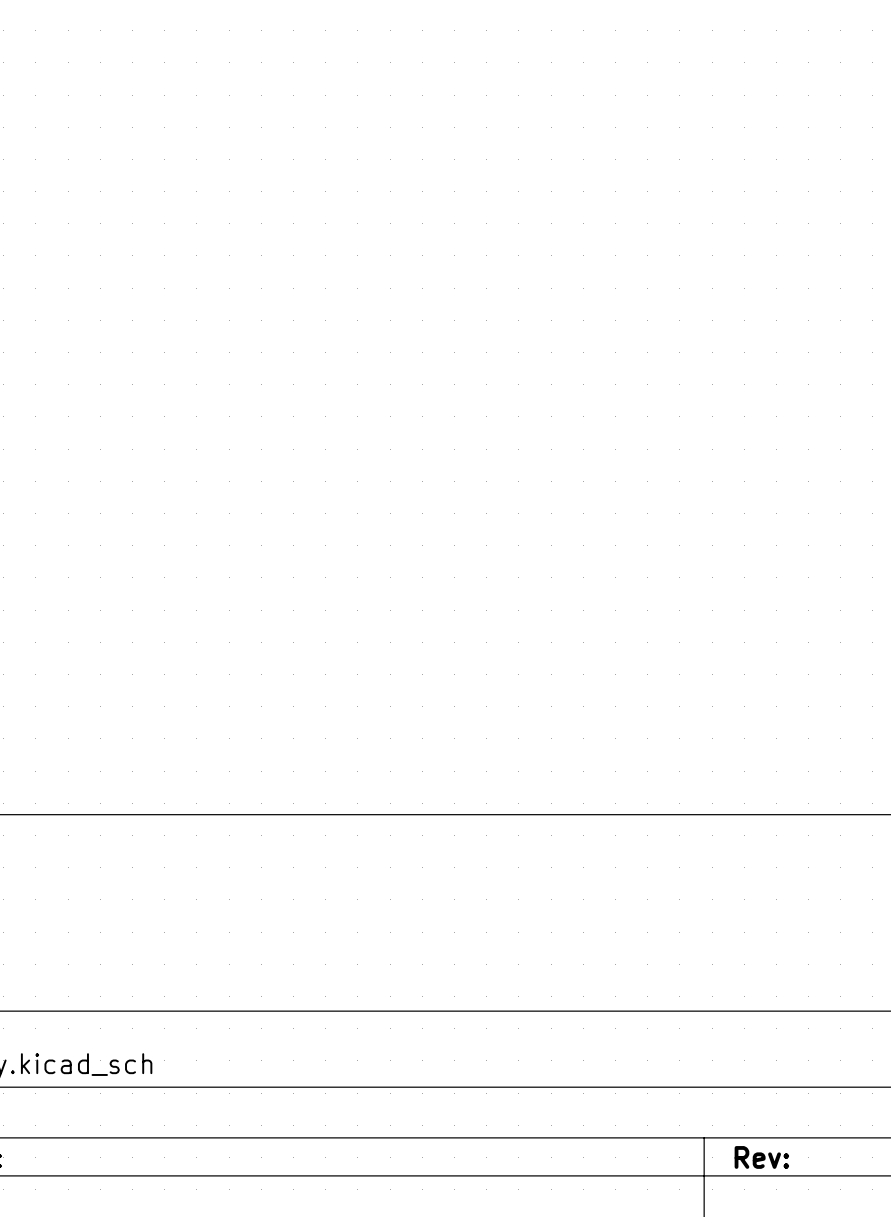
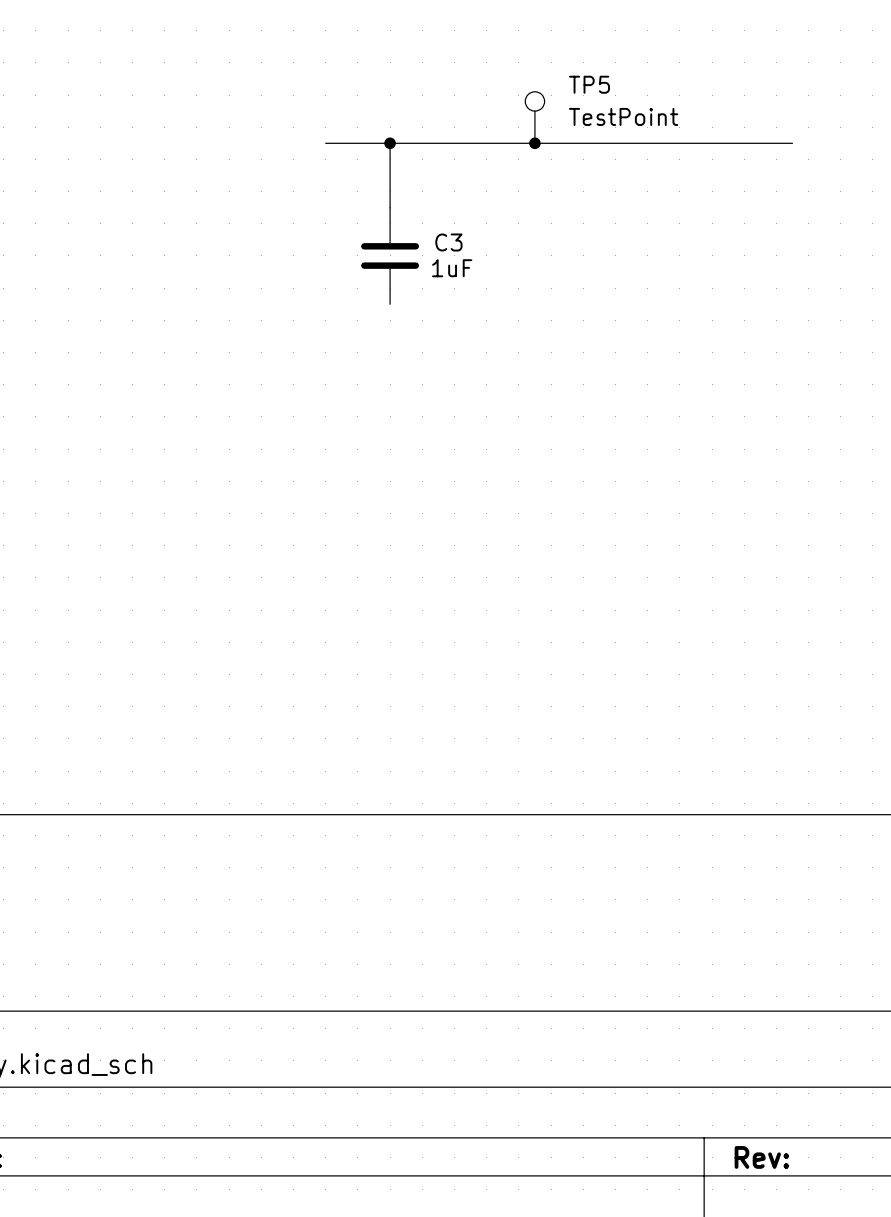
TP5: none -> TestPoint (534, 117)
wire: none -> (325, 143) (792, 143)
wire: none -> (390, 143) (390, 207)
junction: none -> (390, 143)
junction: none -> (534, 143)
C3: none -> 1uF (390, 255)

